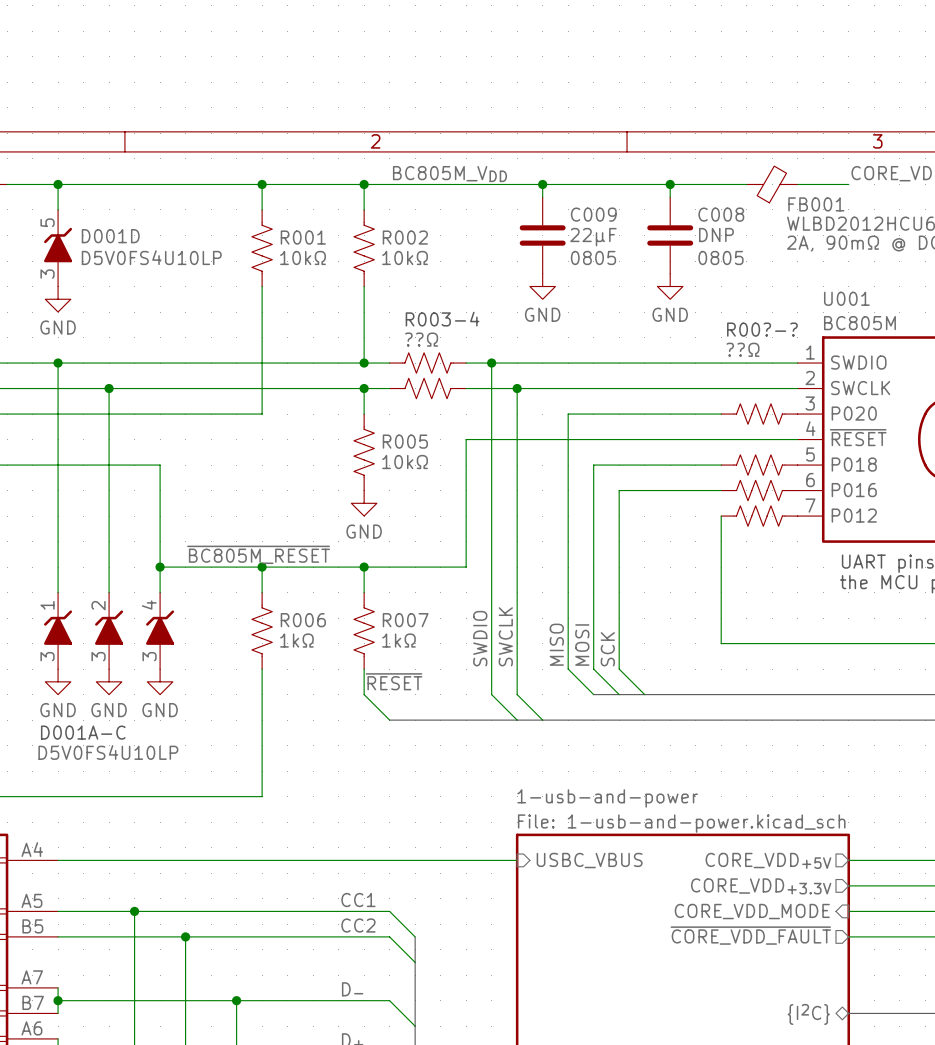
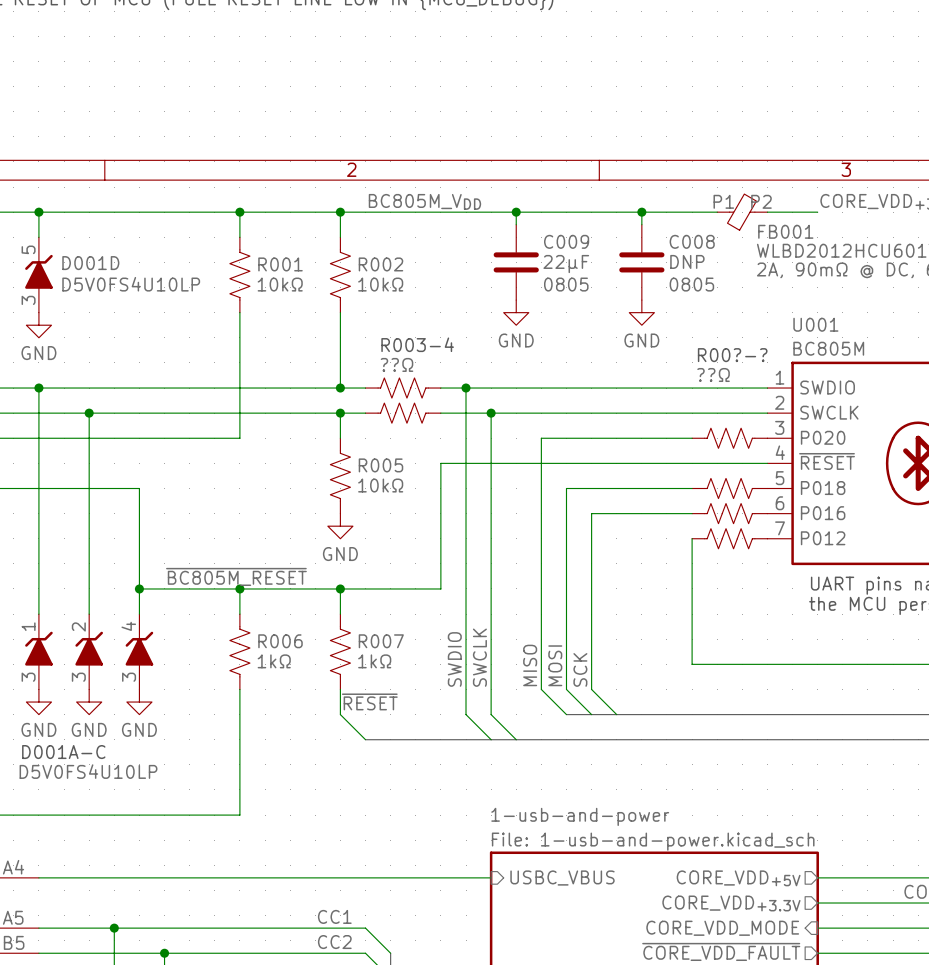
FB001 pin name: none -> P1 (723, 201)
FB001 pin name: none -> P2 (761, 201)

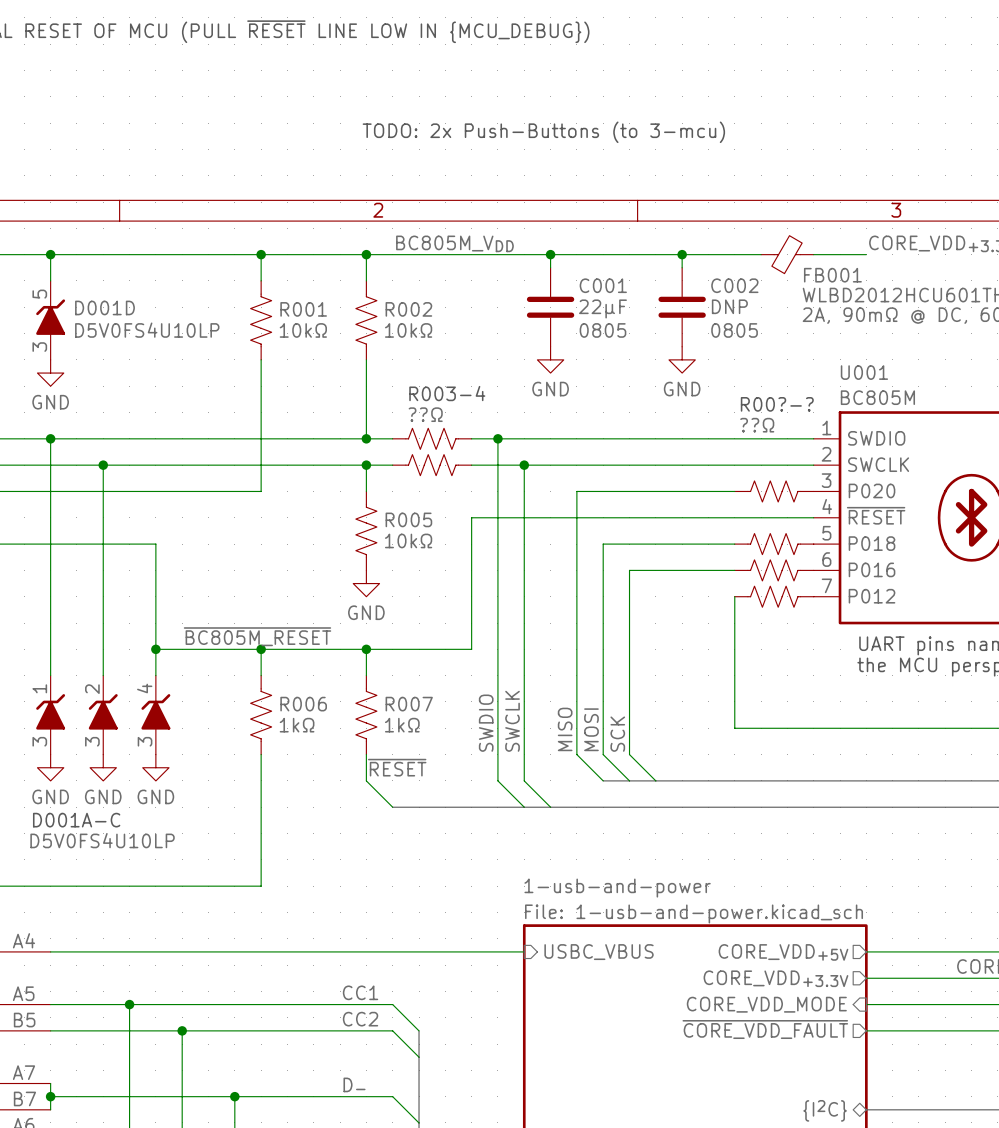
text: none -> TODO: 2x Push-Buttons (to 3-mcu) (543, 132)
FB001 pin name: P1 (723, 201) -> none
FB001 pin name: P2 (761, 201) -> none
C009 name: C009 (566, 241) -> C001 (603, 285)
C008 name: C008 (692, 241) -> C002 (734, 285)

